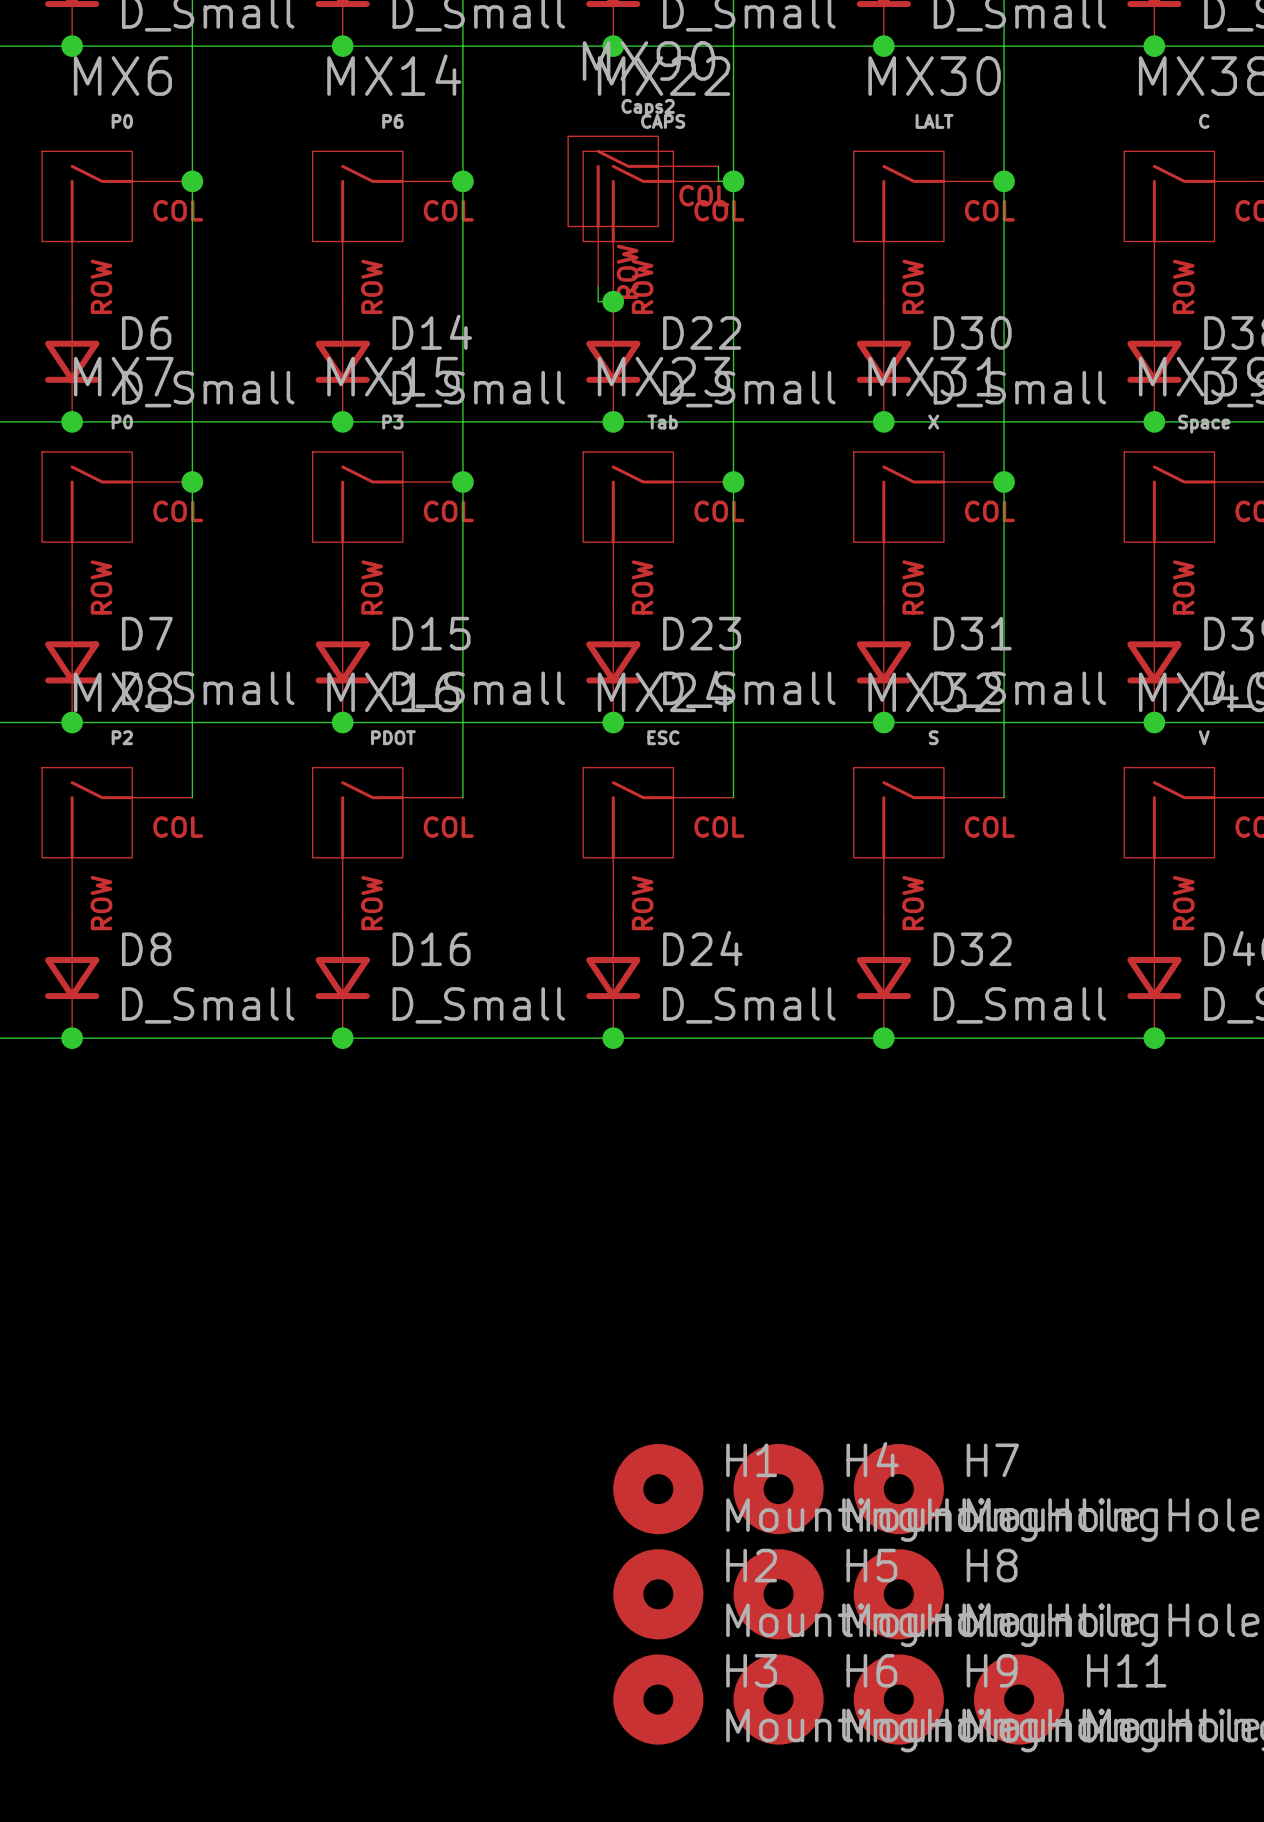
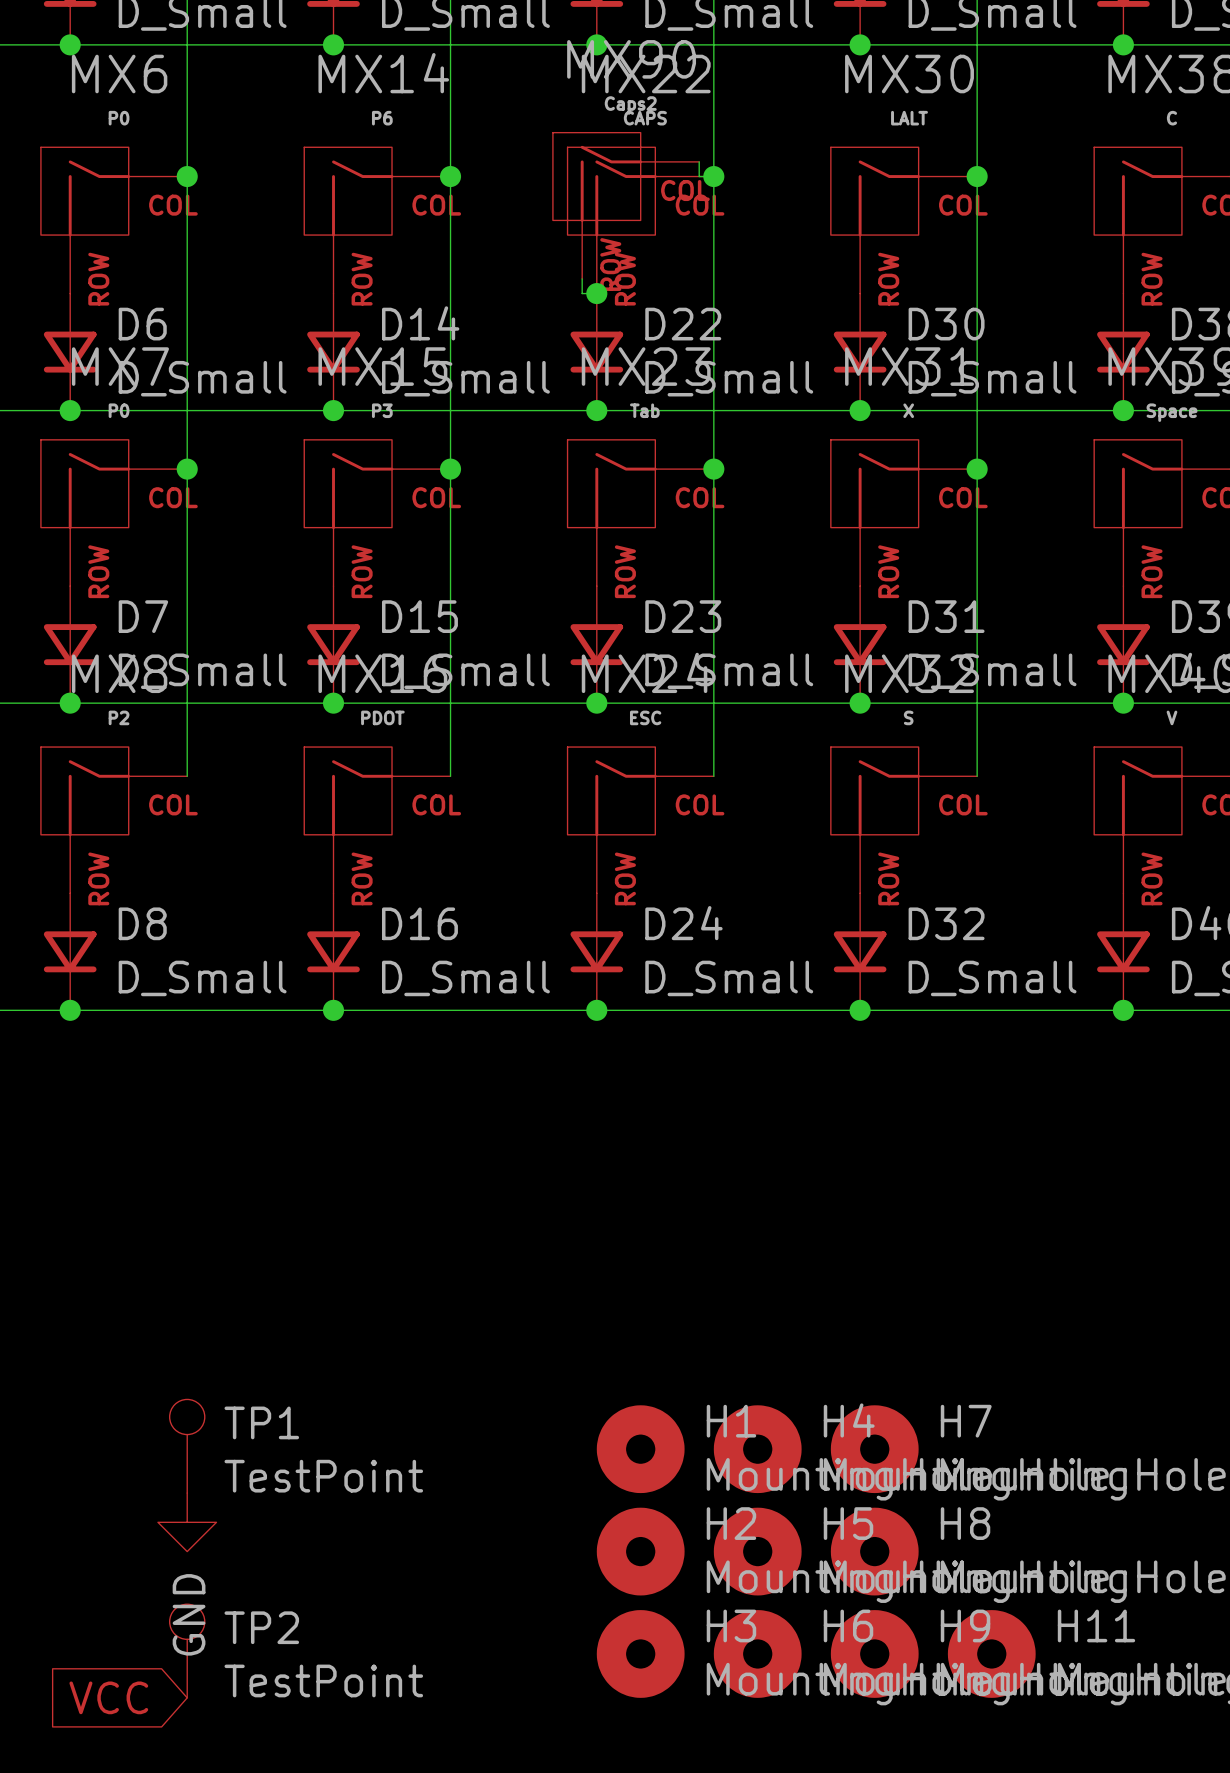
TP1: none -> TestPoint (187, 1446)
power symbol: none -> GND (187, 1522)
TP2: none -> TestPoint (187, 1651)
global label: none -> VCC (108, 1697)

